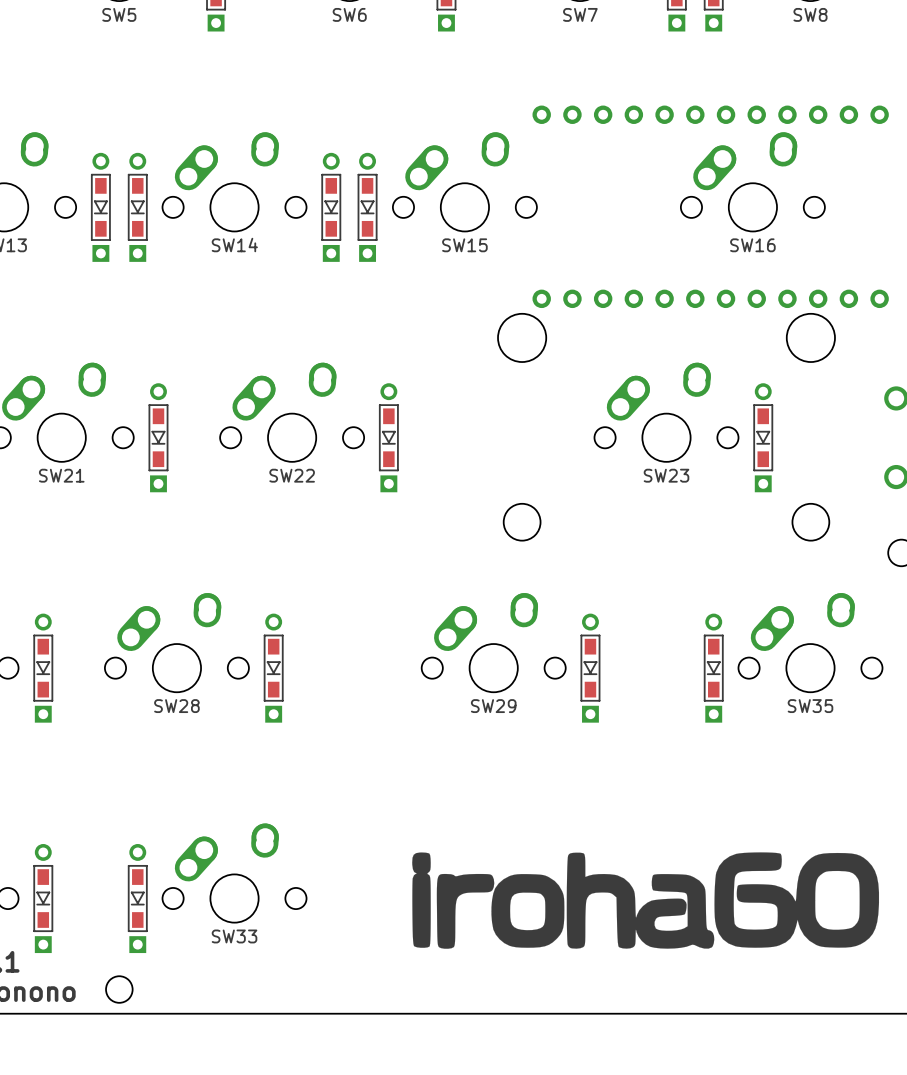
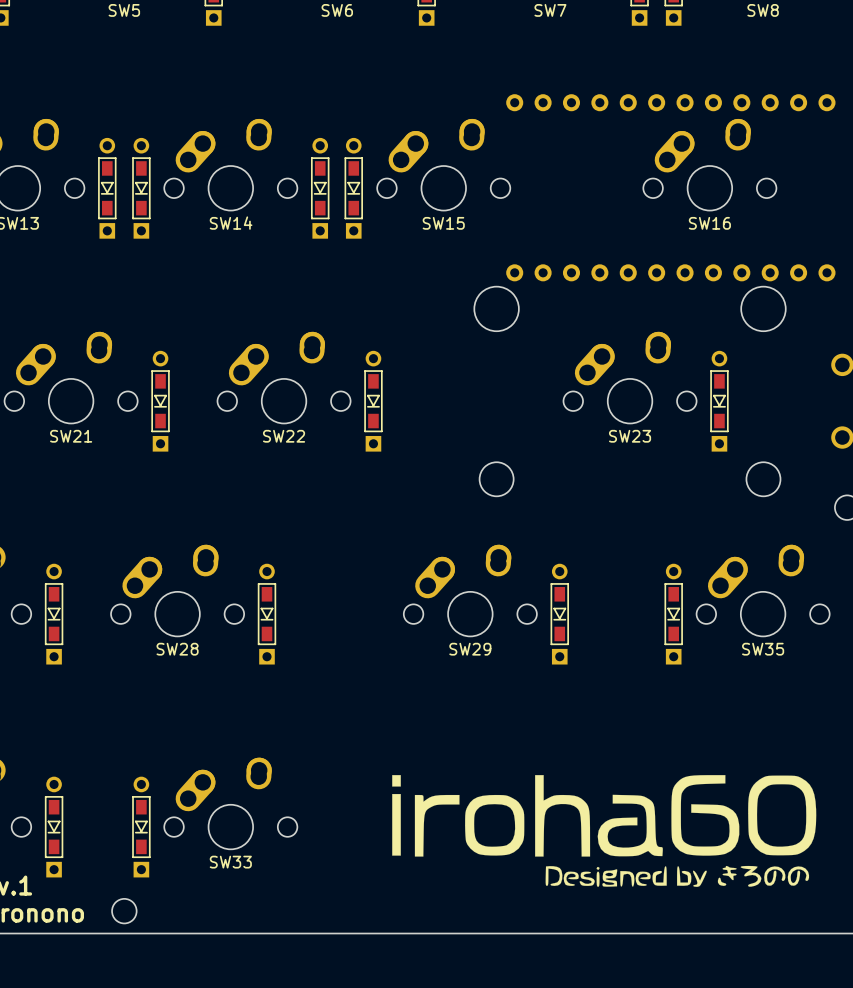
drawing shape: [412, 852, 880, 949] -> [392, 775, 817, 887]

